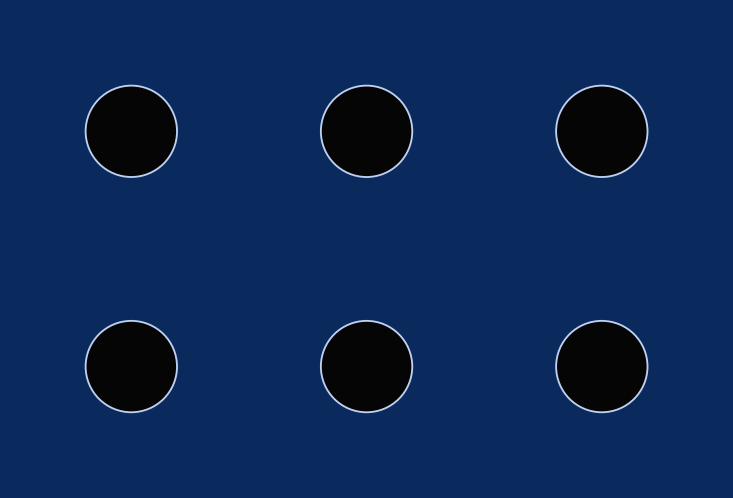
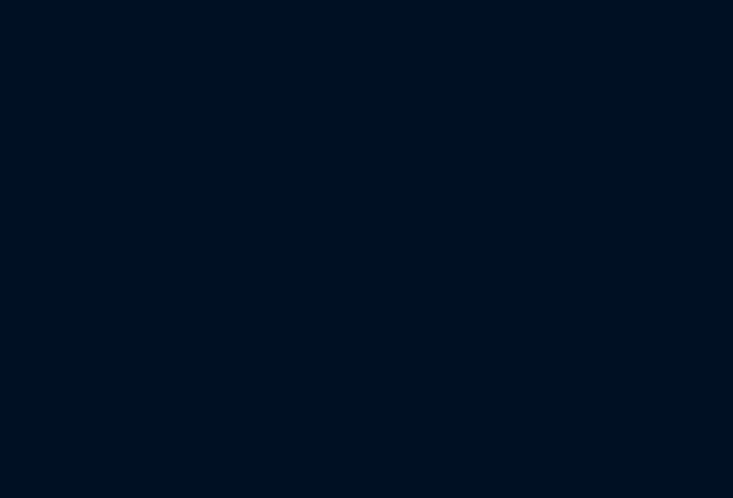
part: (131, 131) -> none
part: (366, 131) -> none
part: (601, 131) -> none
part: (131, 366) -> none
part: (366, 366) -> none
part: (601, 366) -> none

